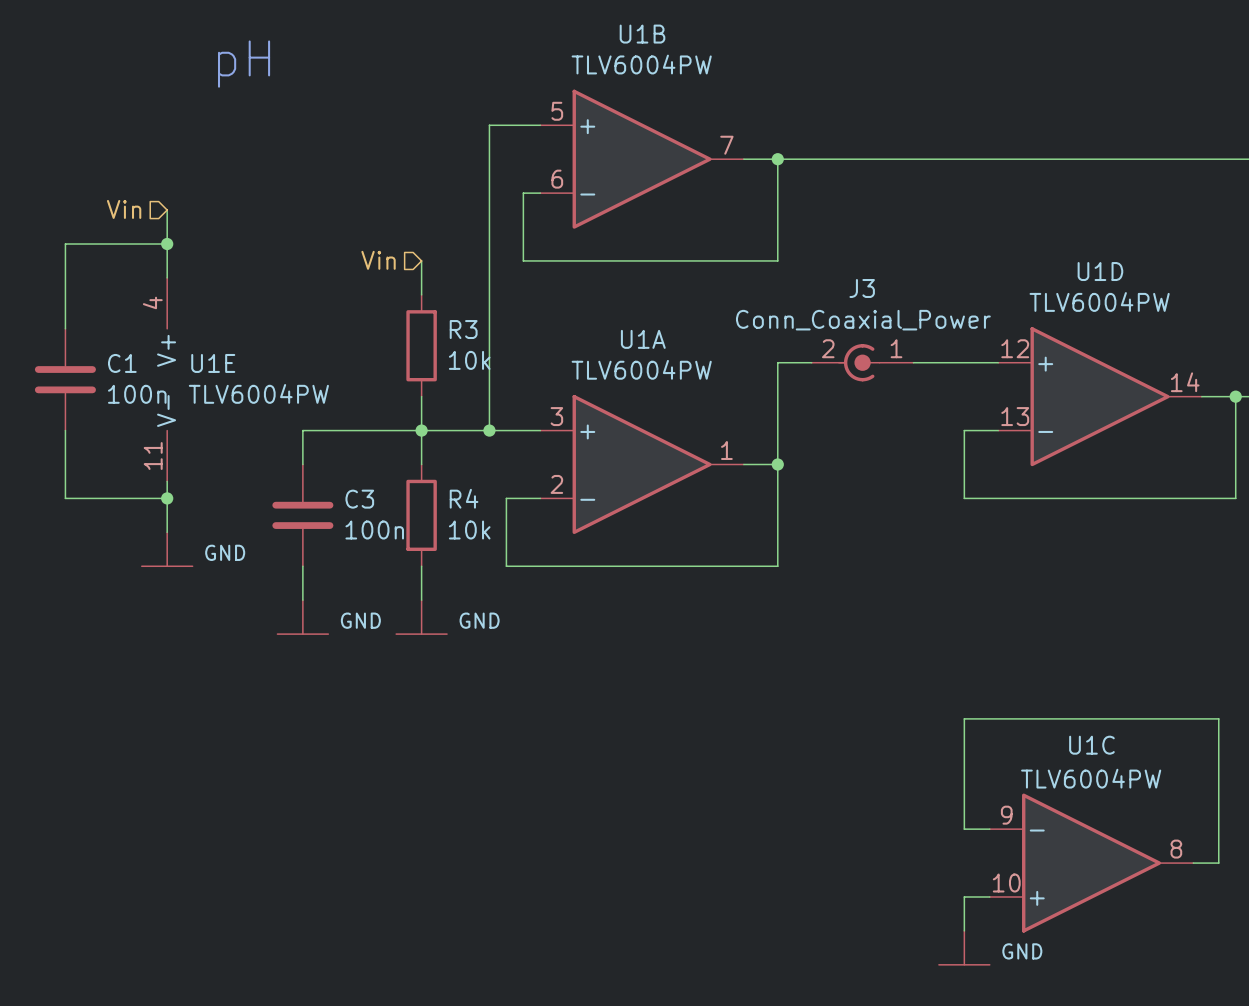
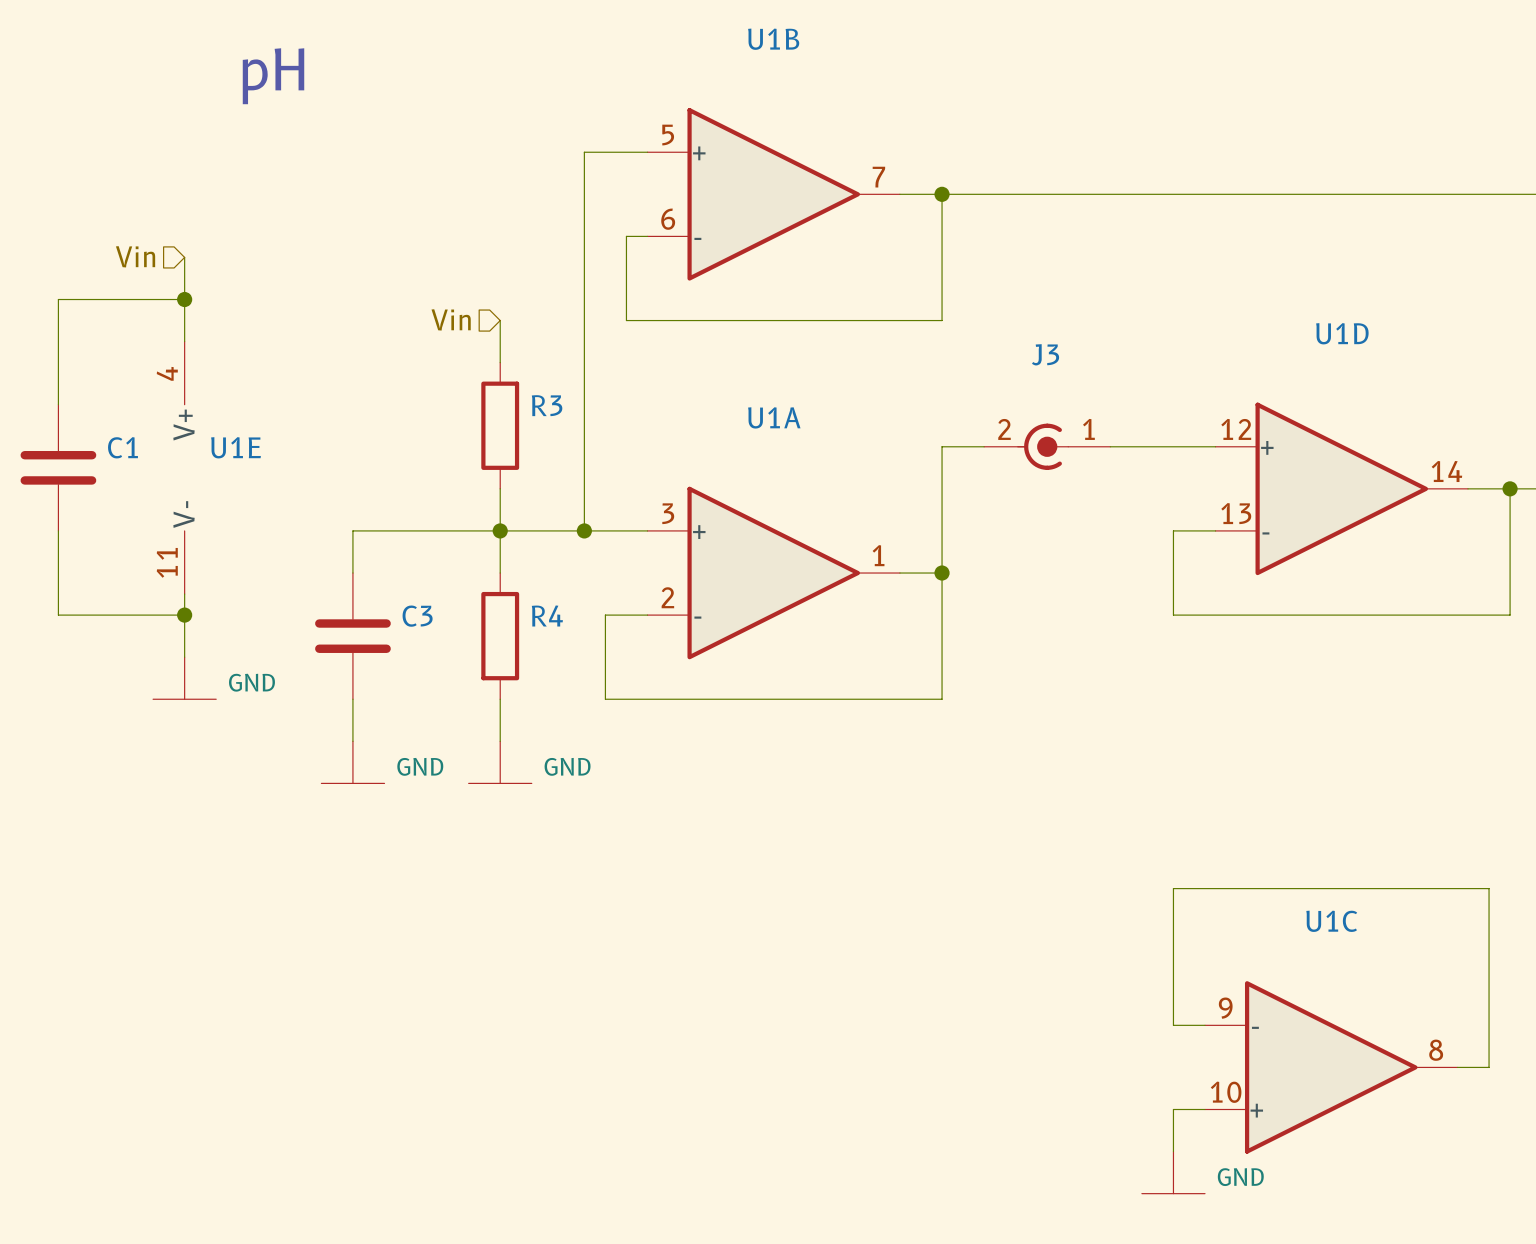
U1B value: TLV6004PW (641, 64) -> none
U1D value: TLV6004PW (1099, 301) -> none
J3 value: Conn_Coaxial_Power (863, 320) -> none
R3 value: 10k (469, 360) -> none
U1A value: TLV6004PW (641, 369) -> none
U1E value: TLV6004PW (258, 393) -> none
C1 value: 100n (137, 394) -> none
C3 value: 100n (374, 530) -> none
R4 value: 10k (469, 530) -> none
U1C value: TLV6004PW (1091, 778) -> none

